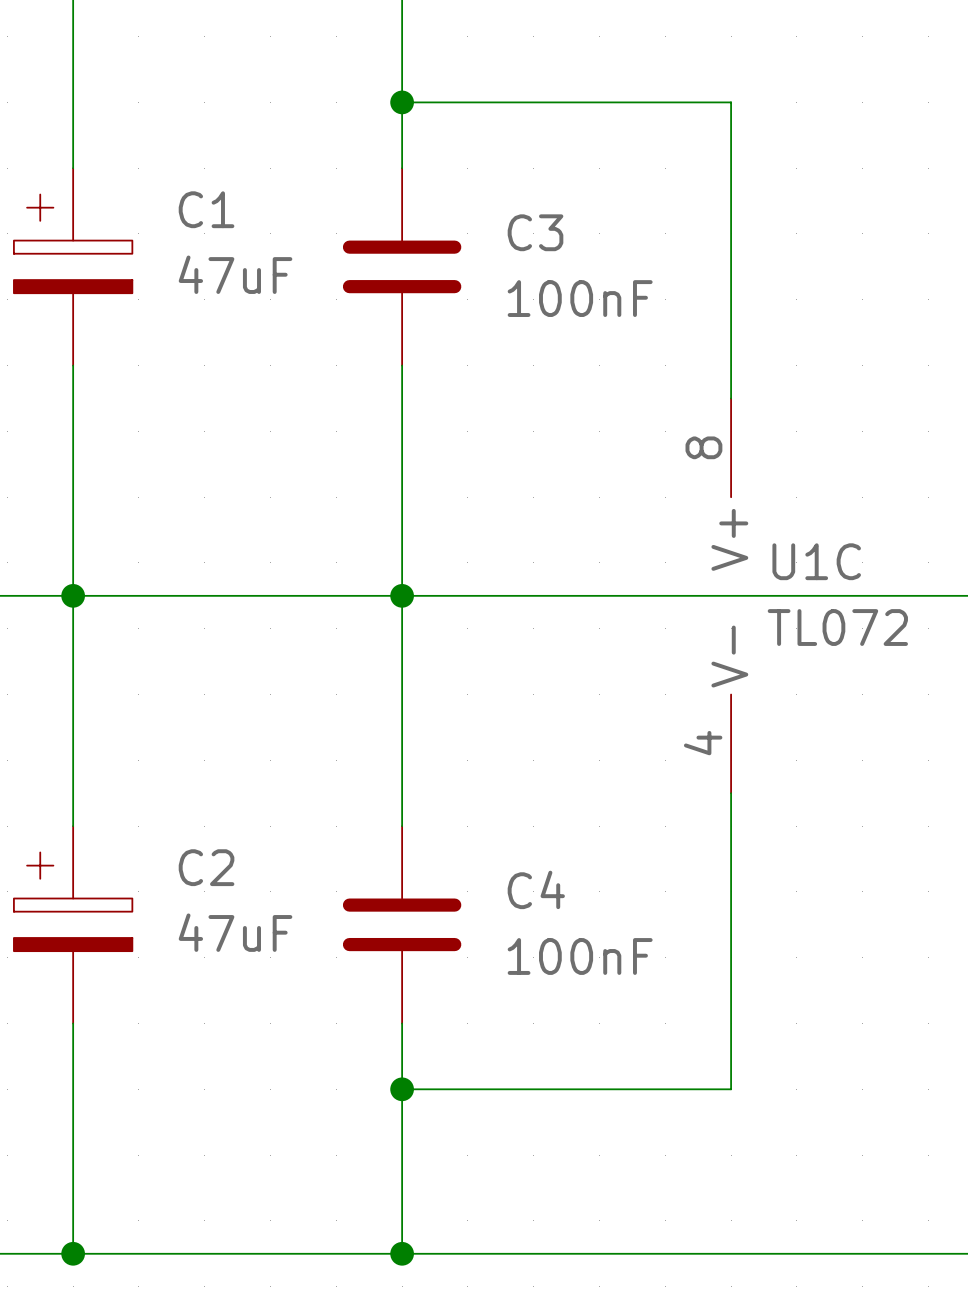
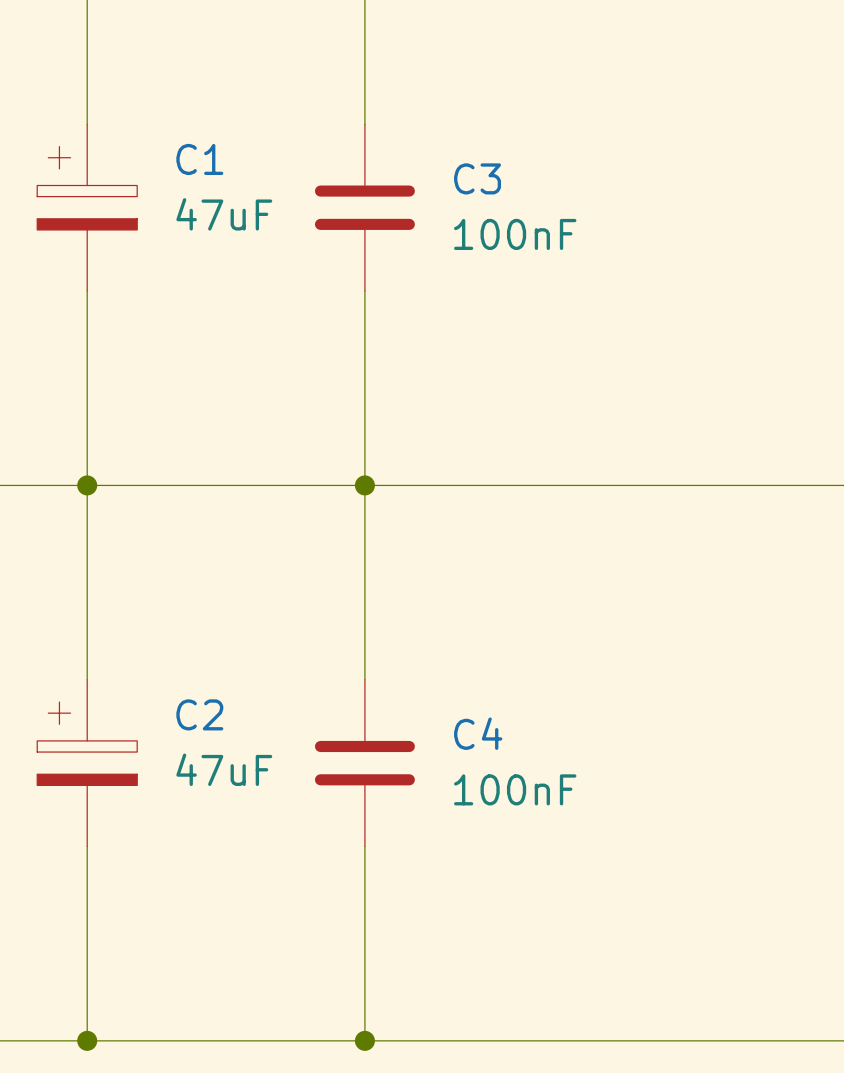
wire: (402, 102) (731, 102) (731, 398) -> none
junction: (402, 102) -> none
U1C: TL072 (731, 595) -> none
wire: (731, 793) (731, 1089) (402, 1089) -> none
junction: (402, 1089) -> none

